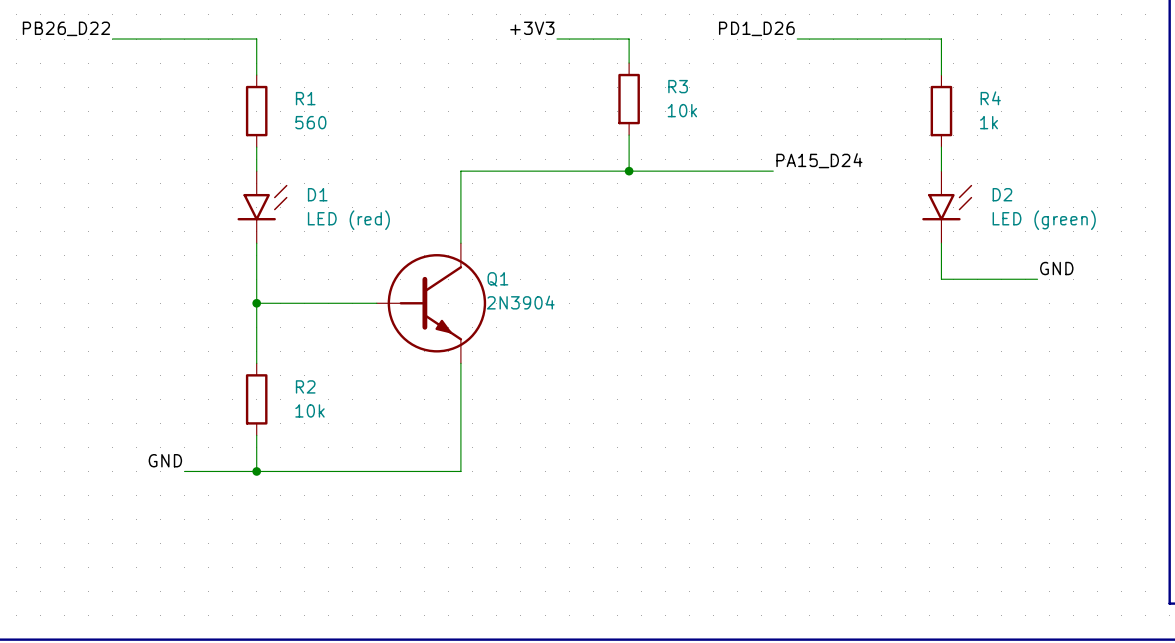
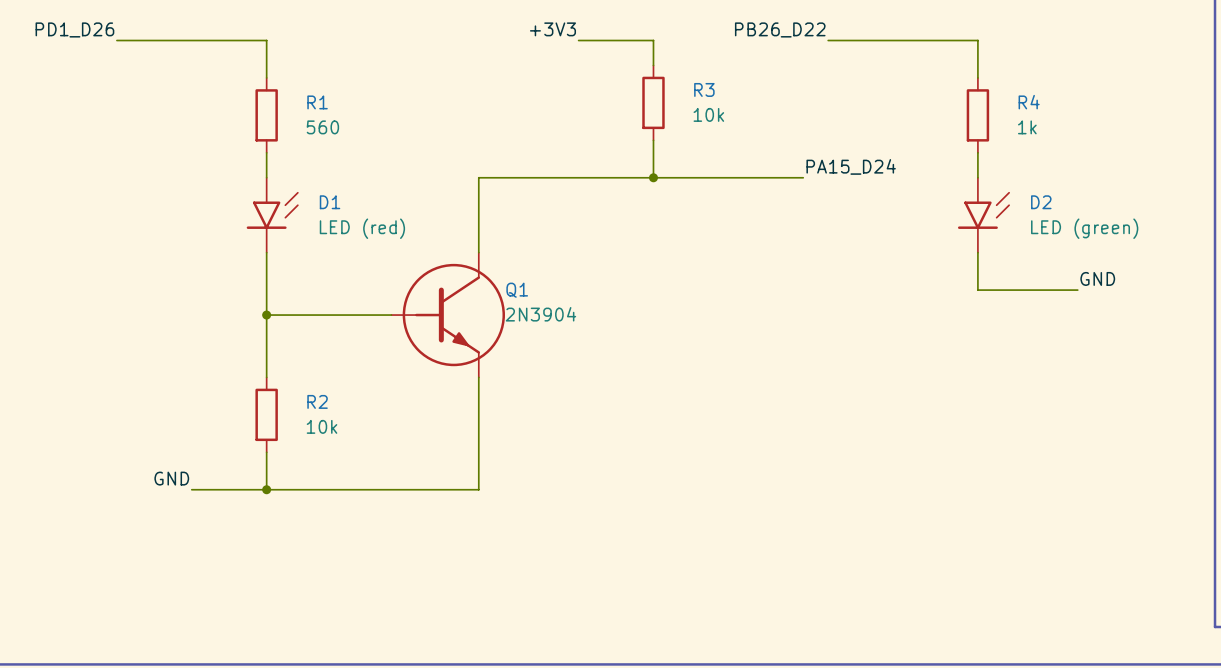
label: PB26_D22 (66, 28) -> PD1_D26 (74, 29)
label: PD1_D26 (756, 28) -> PB26_D22 (780, 29)

